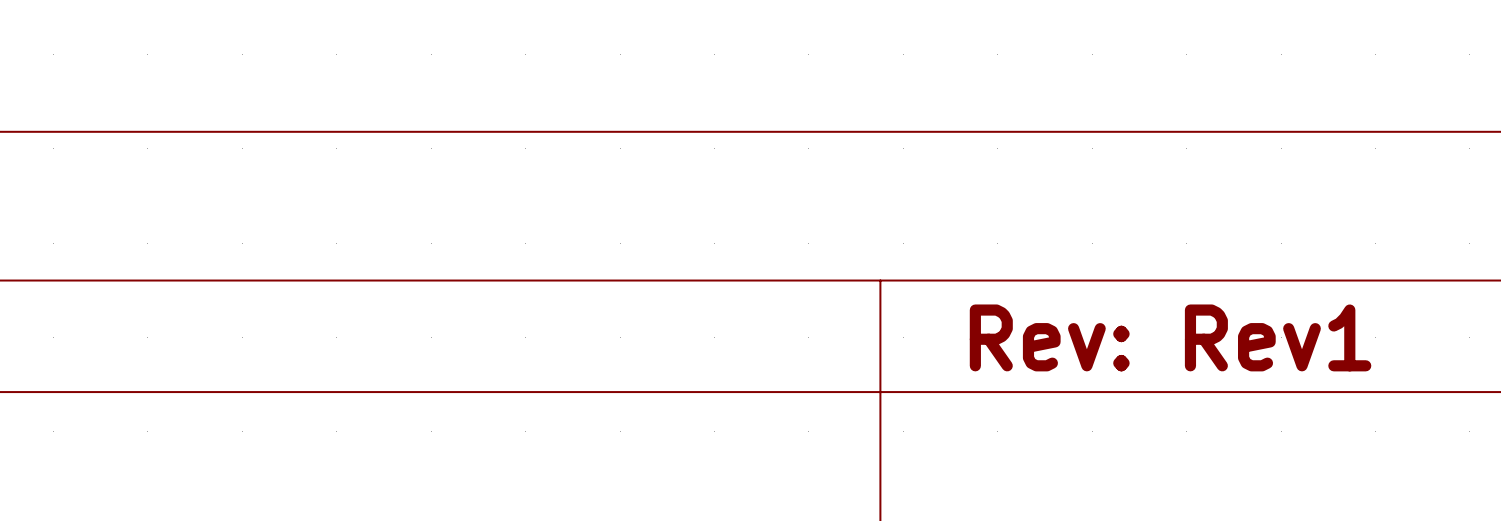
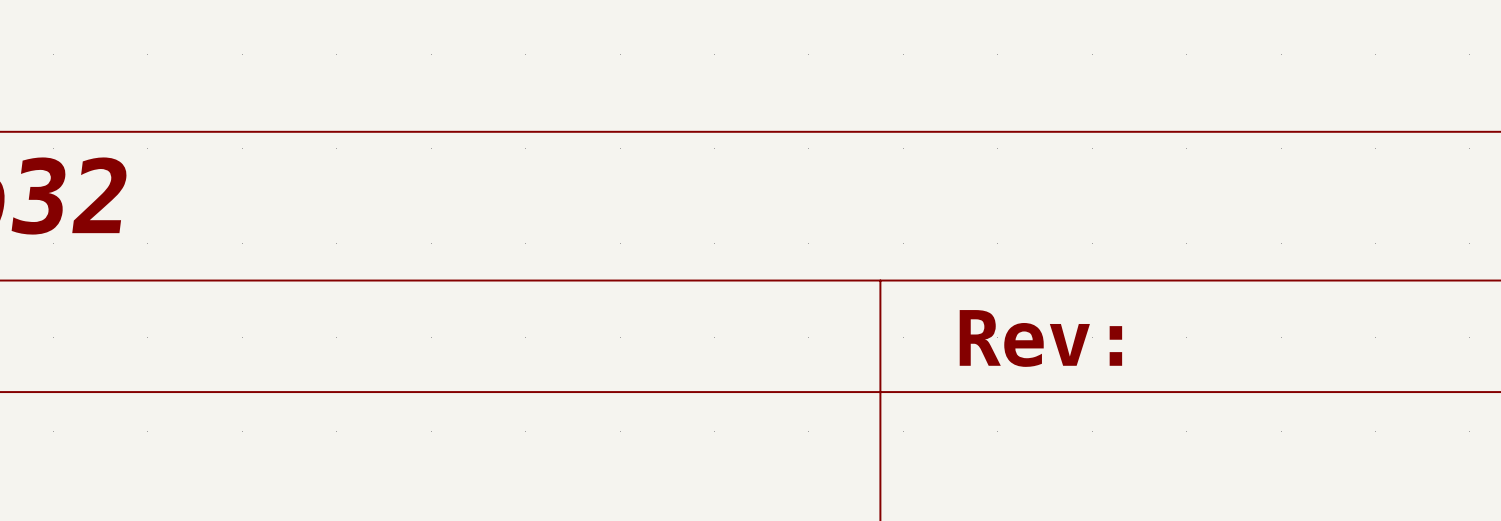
title block: Rev: Rev1 (1170, 337) -> Rev: (1040, 338)

